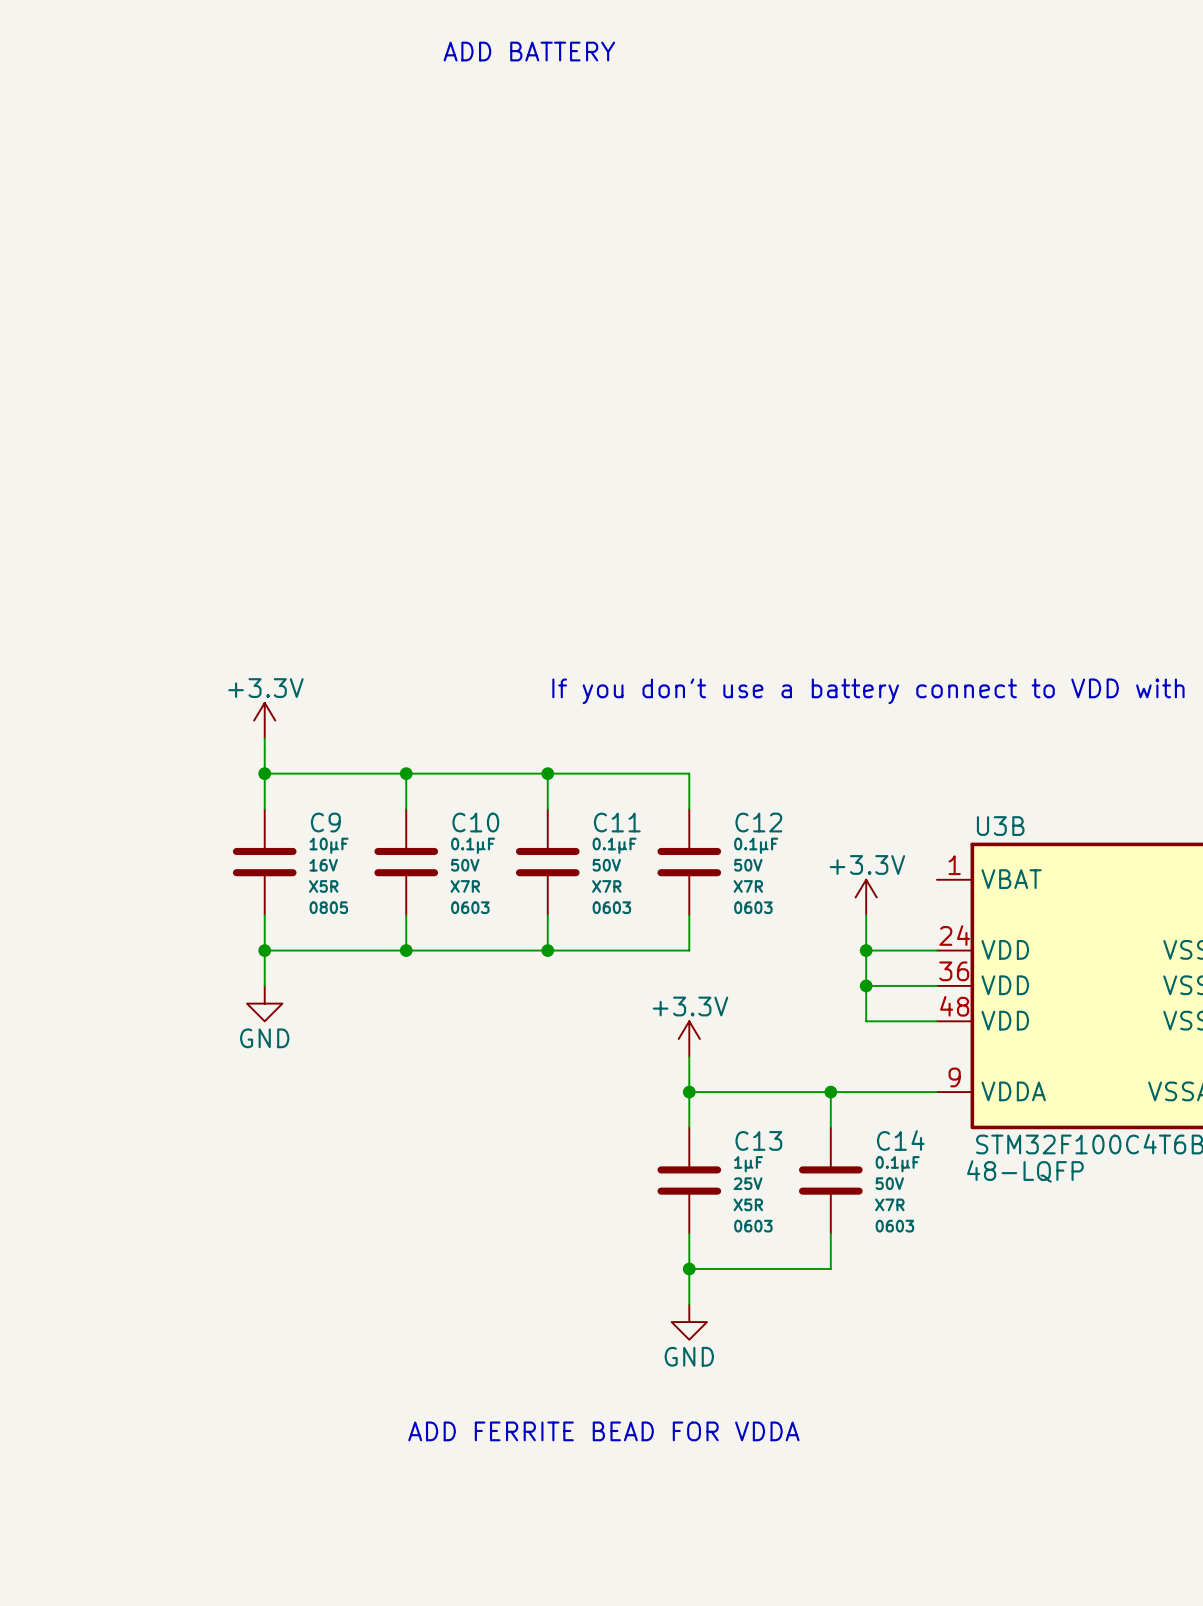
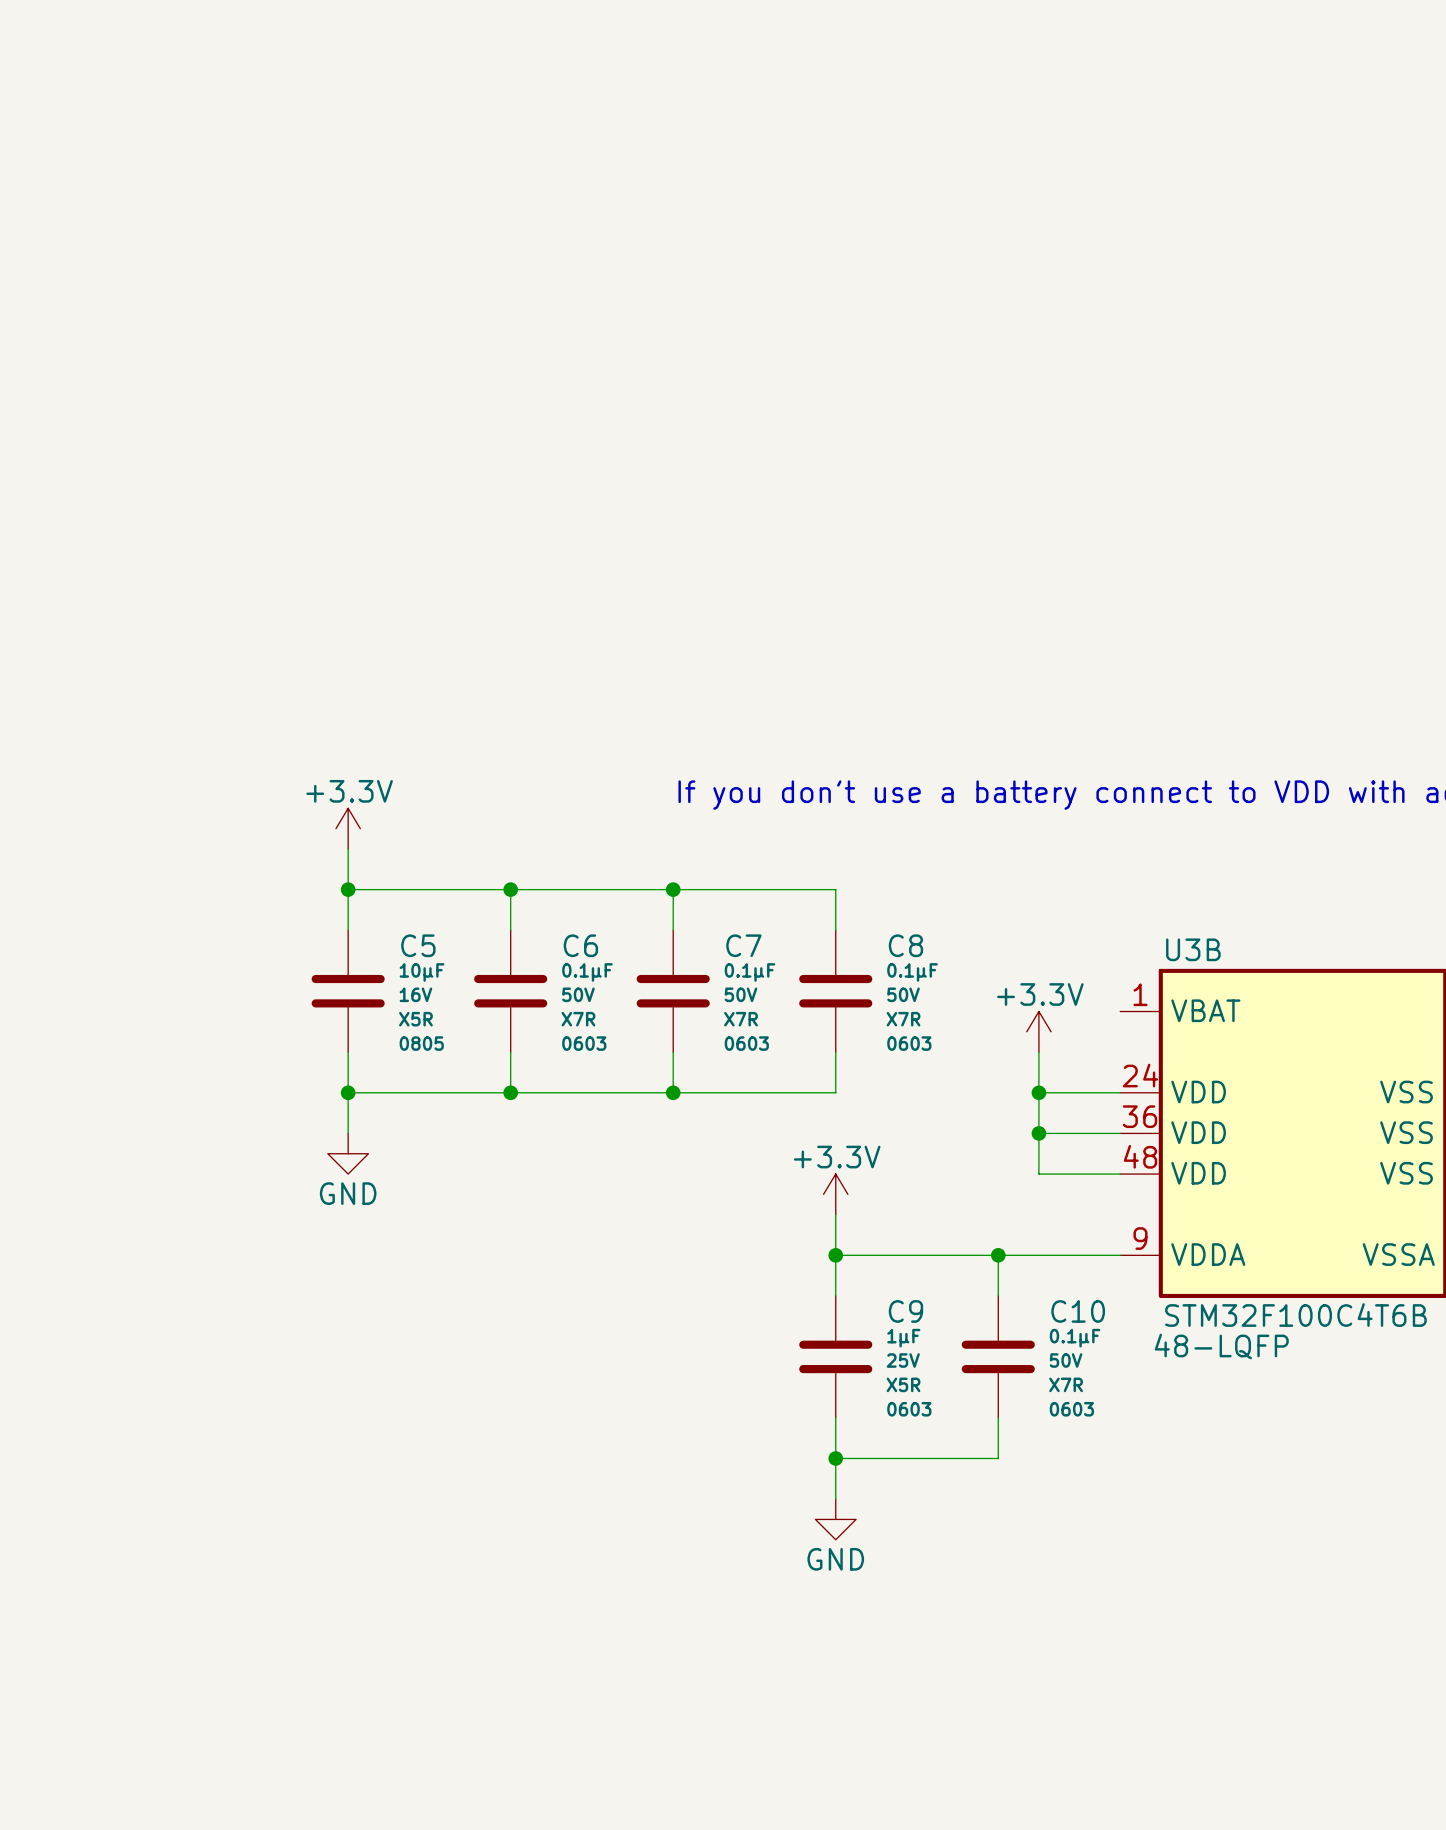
text: ADD BATTERY (529, 51) -> none
C9 name: C9 (325, 822) -> C5 (418, 945)
C10 name: C10 (475, 822) -> C6 (580, 945)
C11 name: C11 (617, 822) -> C7 (743, 945)
C12 name: C12 (758, 822) -> C8 (905, 945)
C13 name: C13 (758, 1140) -> C9 (905, 1311)
C14 name: C14 (900, 1140) -> C10 (1078, 1311)
text: ADD FERRITE BEAD FOR VDDA (603, 1431) -> none

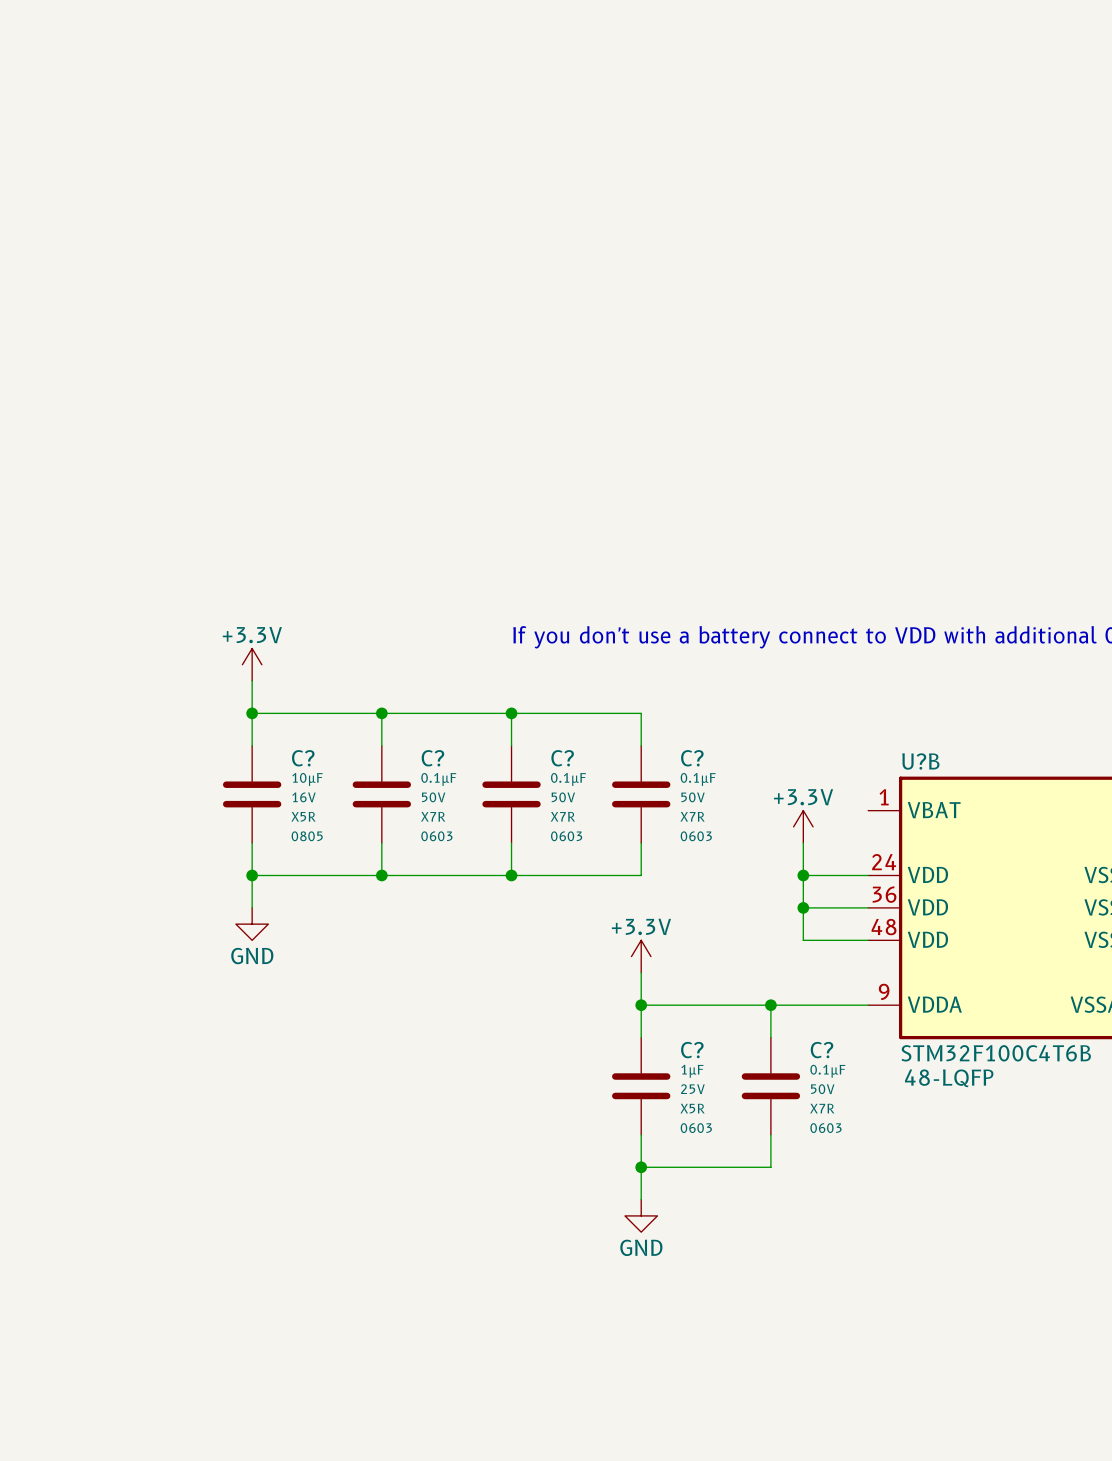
C5 name: C5 (418, 945) -> C? (303, 758)
C6 name: C6 (580, 945) -> C? (432, 758)
C7 name: C7 (743, 945) -> C? (562, 758)
C8 name: C8 (905, 945) -> C? (692, 758)
U3B name: U3B (1193, 949) -> U?B (920, 761)
C9 name: C9 (905, 1311) -> C? (692, 1050)
C10 name: C10 (1078, 1311) -> C? (822, 1050)

